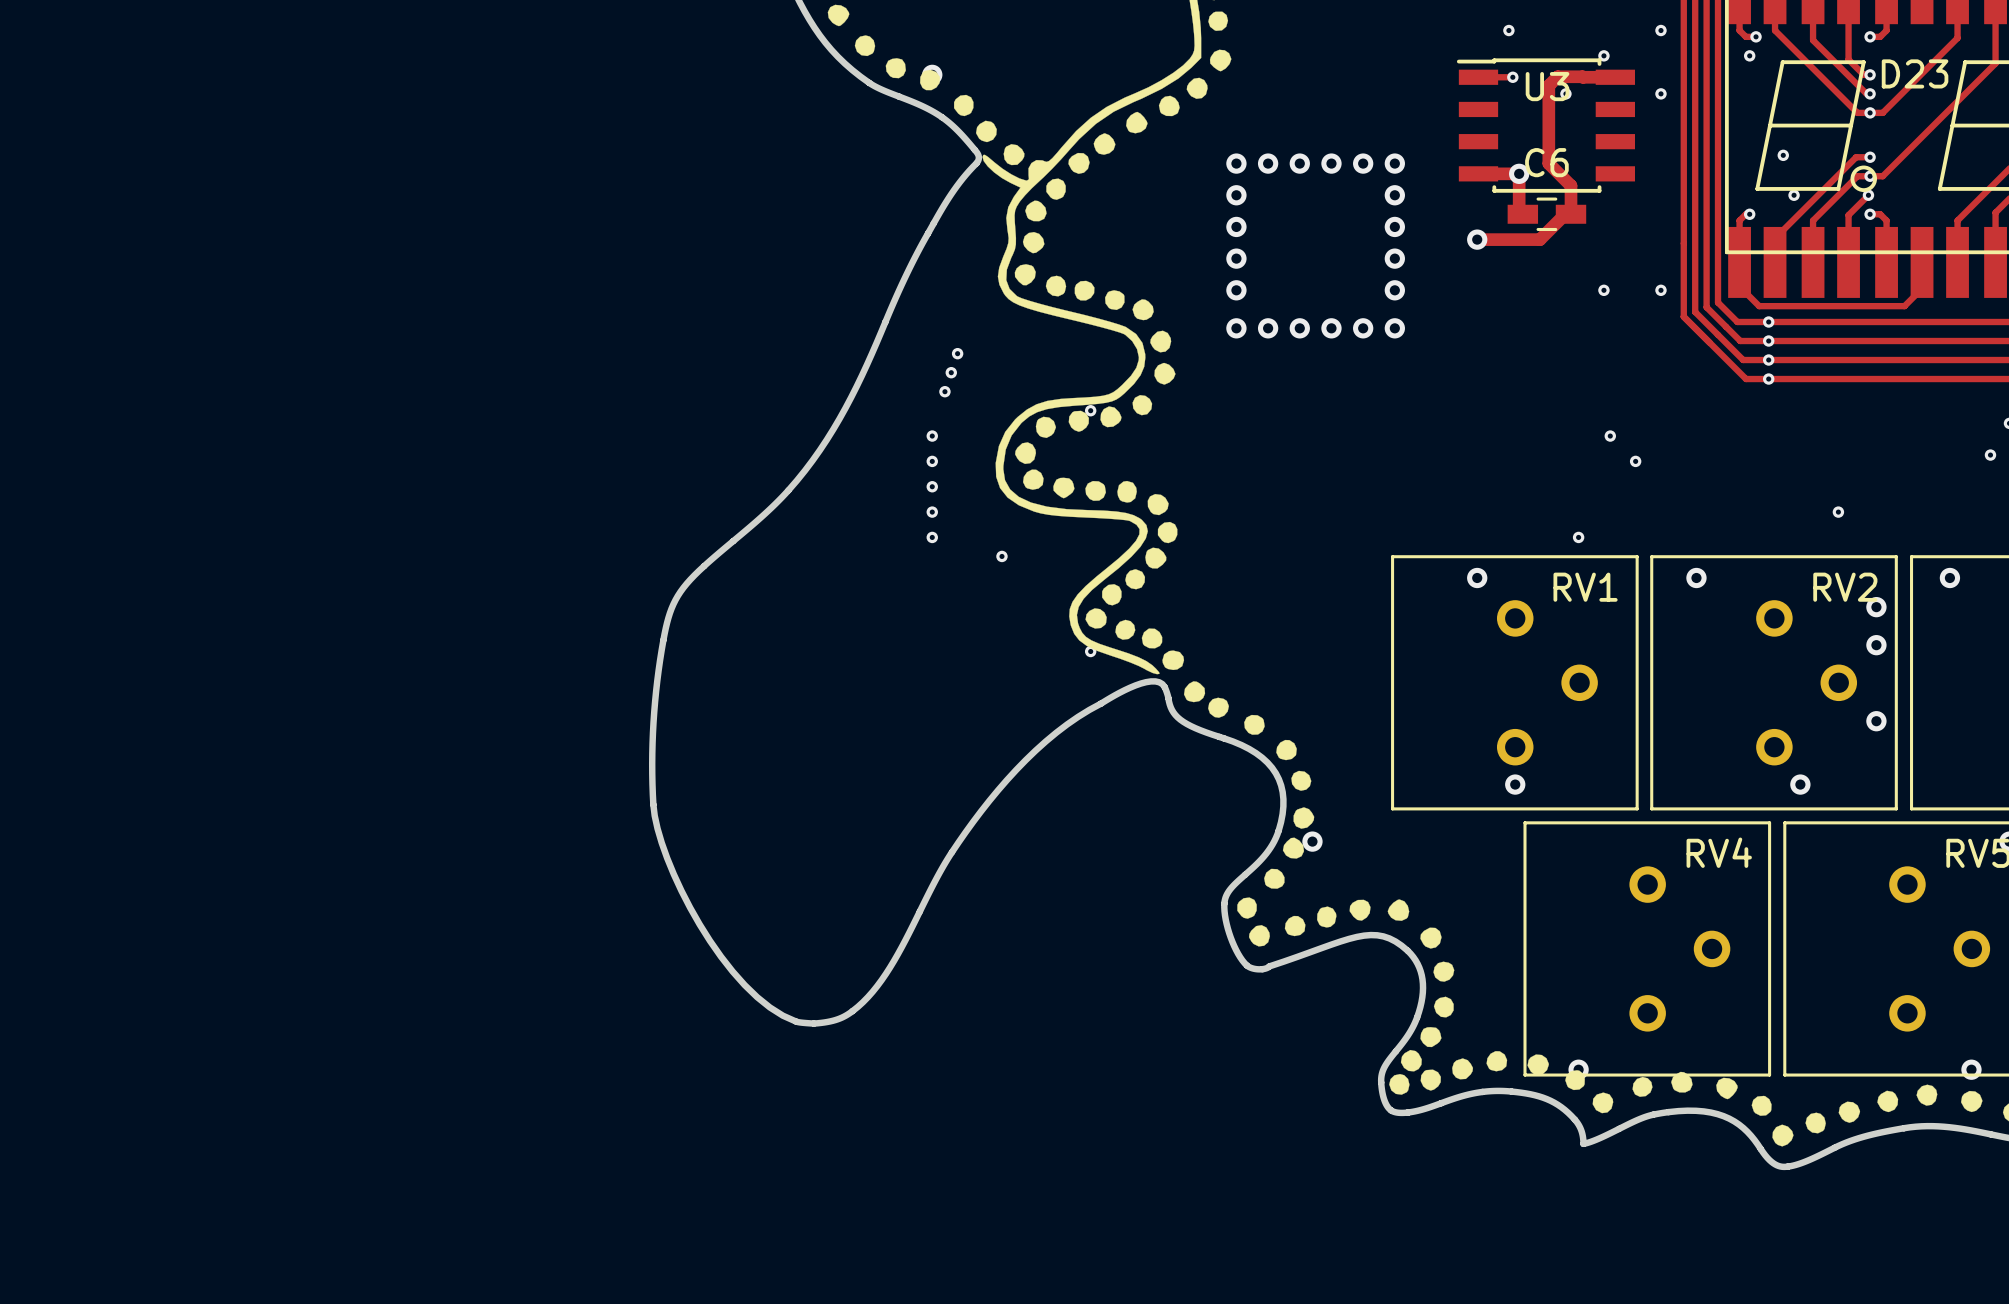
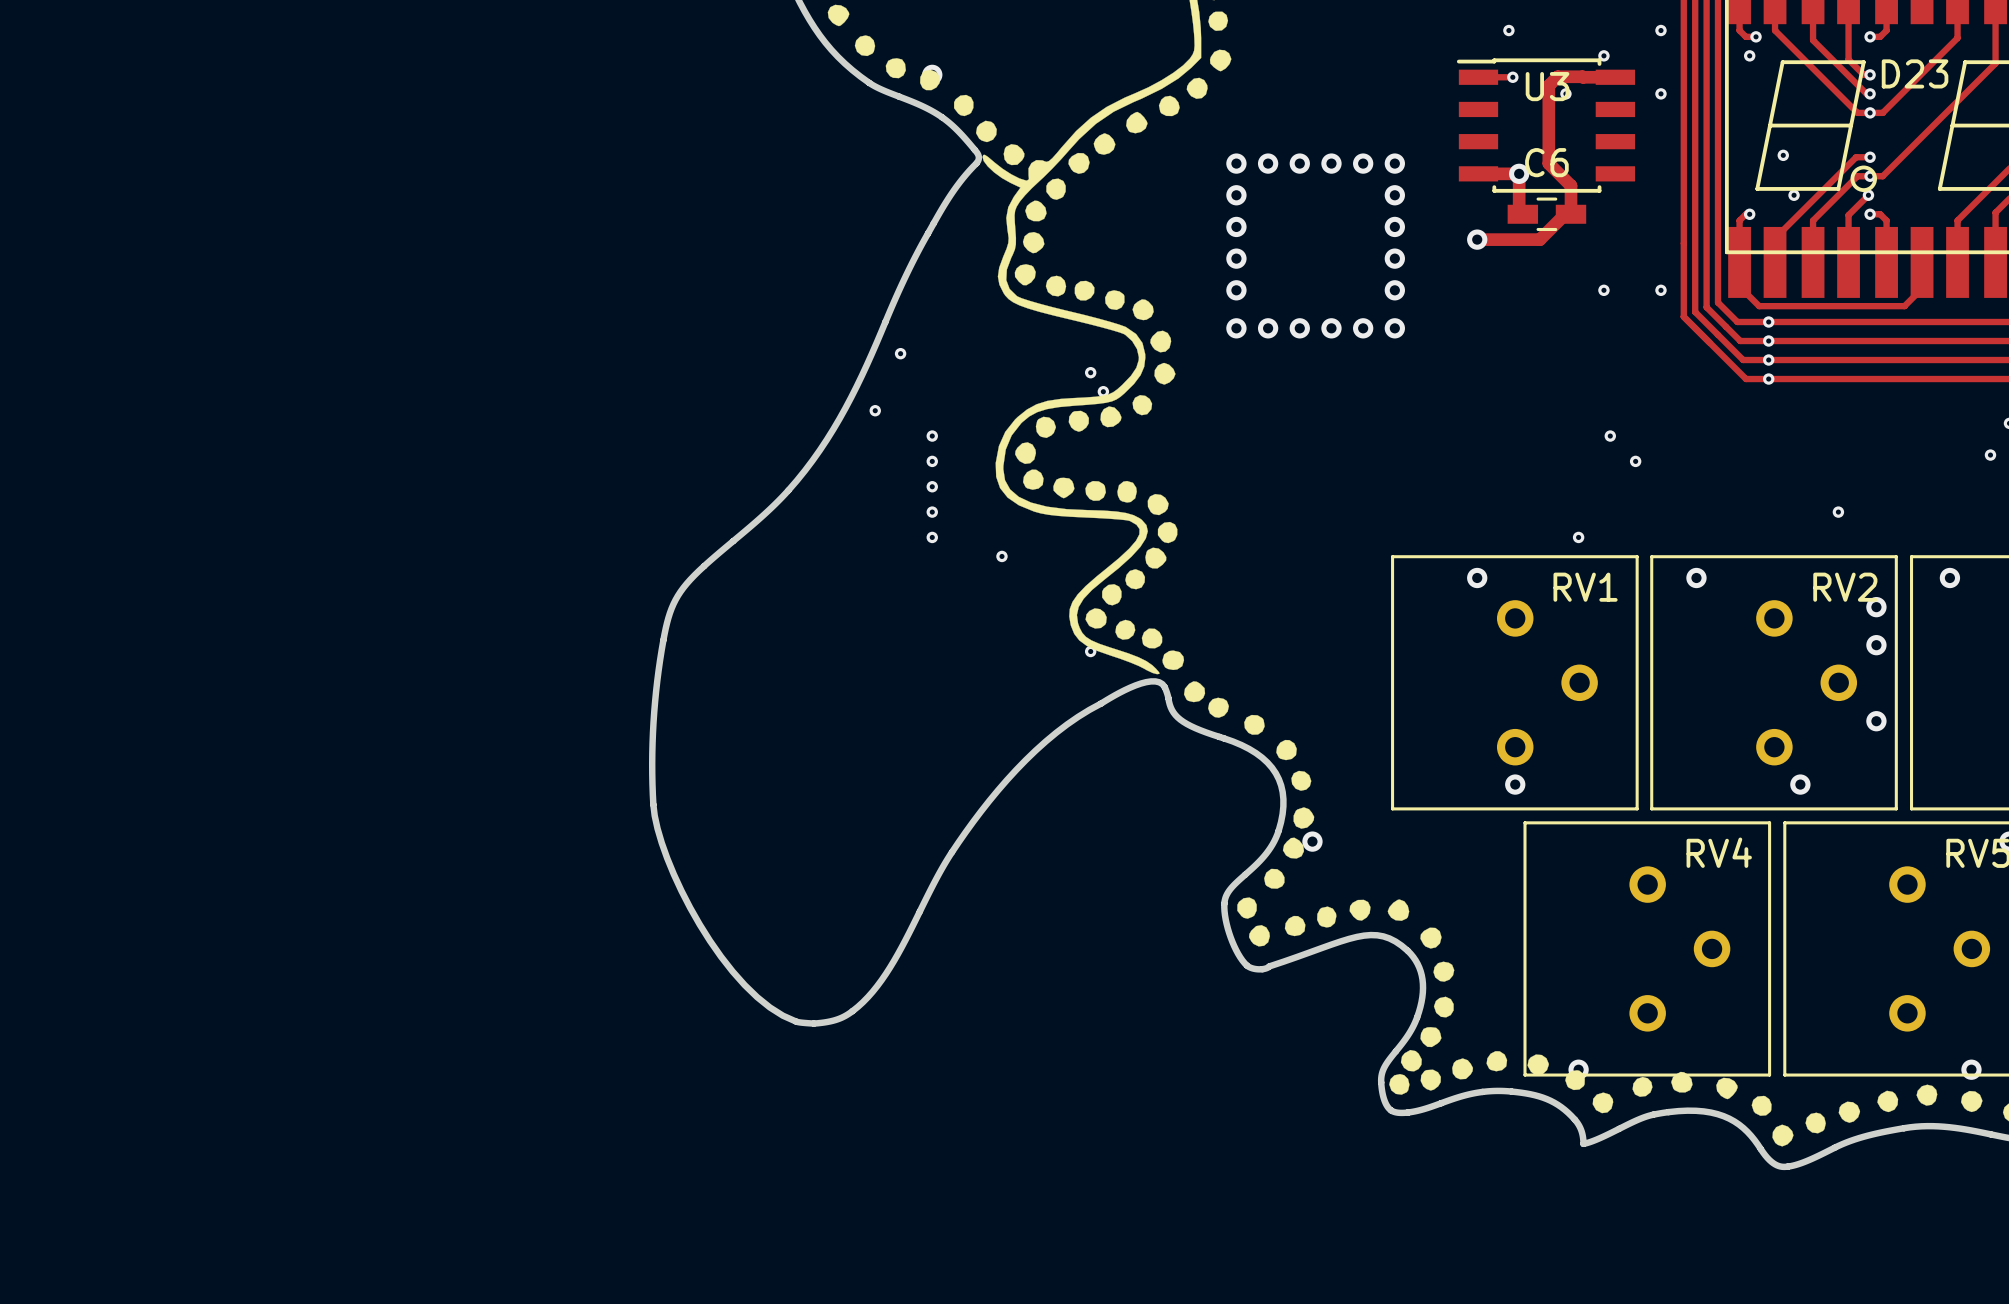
via: none -> (900, 353)
via: (957, 353) -> none
via: (951, 372) -> none
via: none -> (1090, 372)
via: (944, 391) -> none
via: none -> (1103, 391)
via: none -> (875, 410)
via: (1090, 410) -> none

